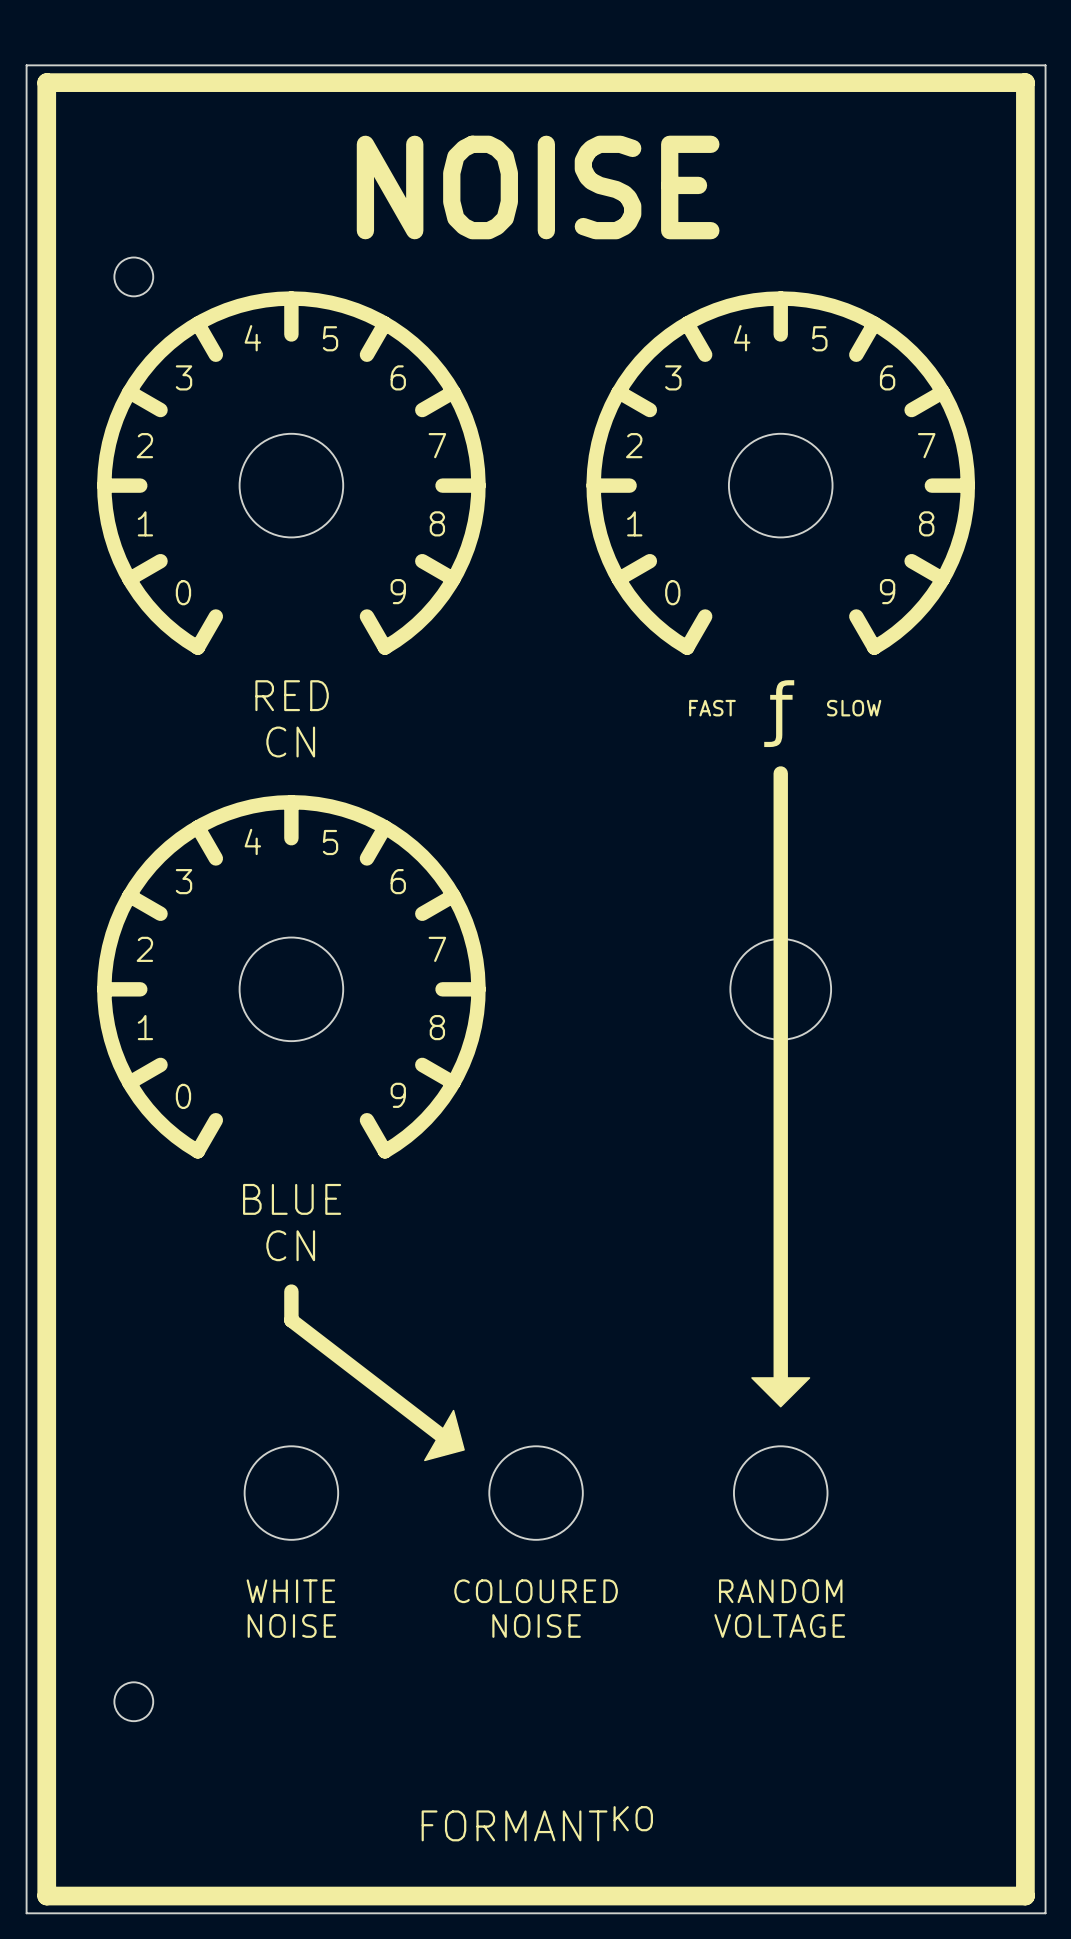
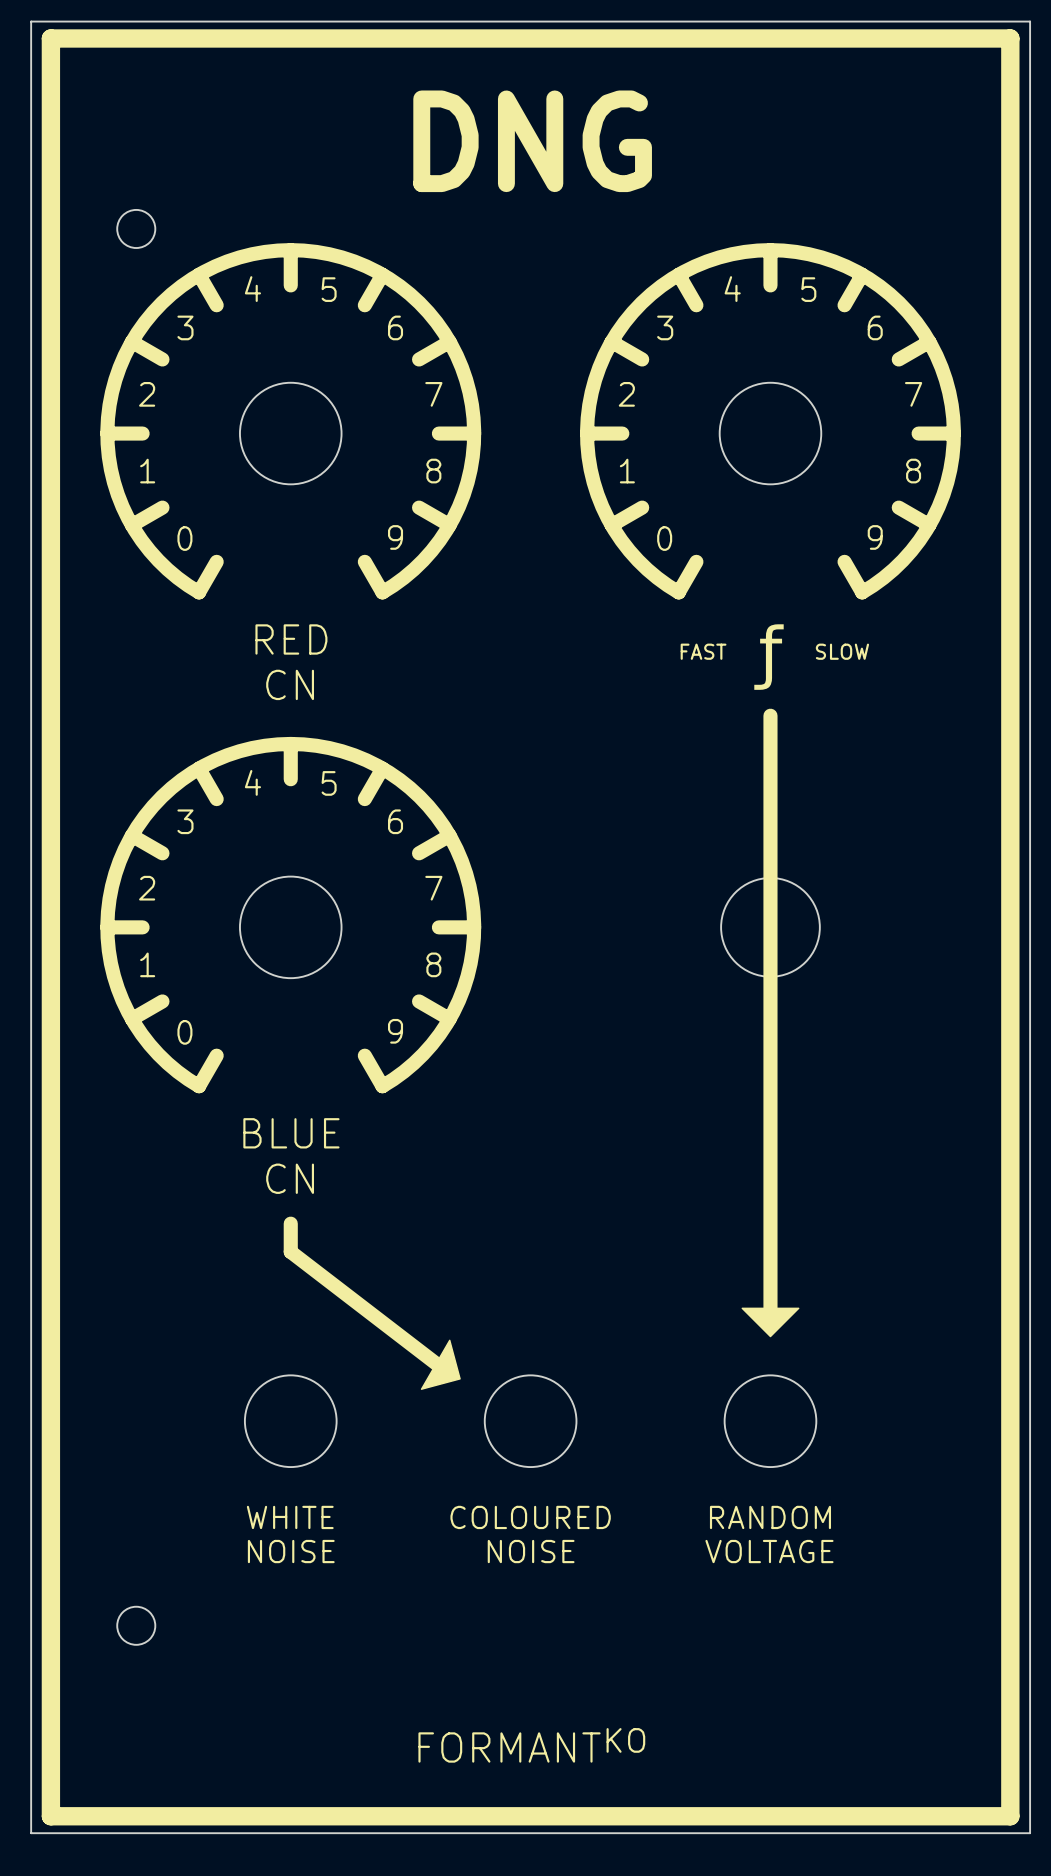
text: NOISE (538, 187) -> DNG (532, 141)

